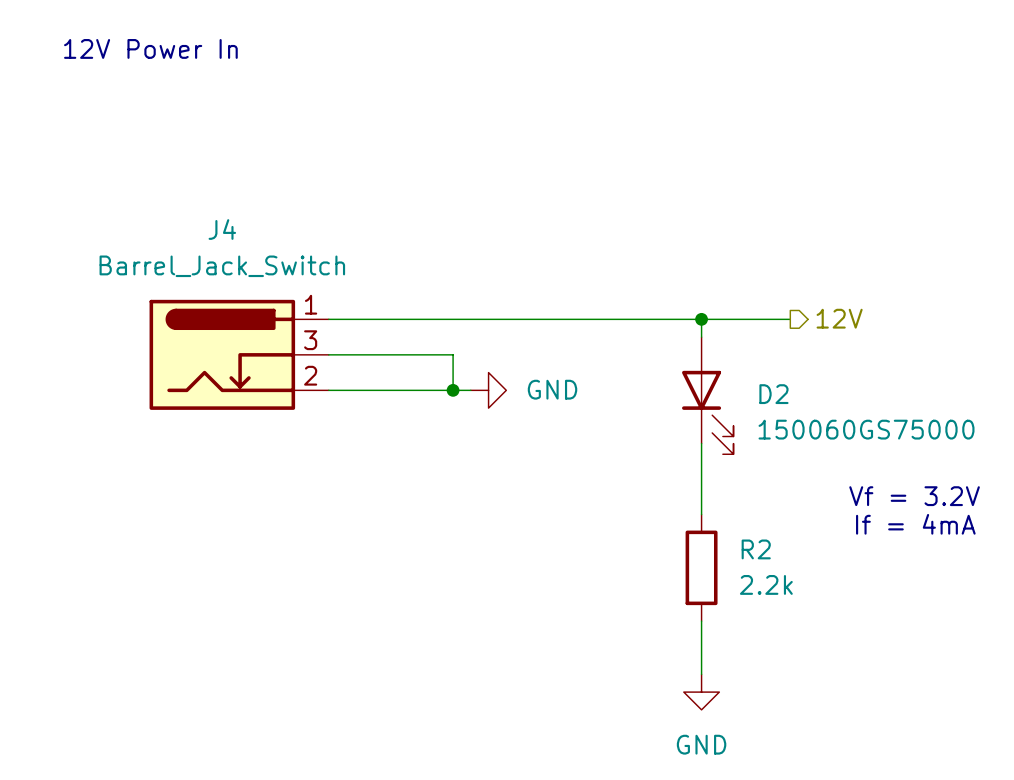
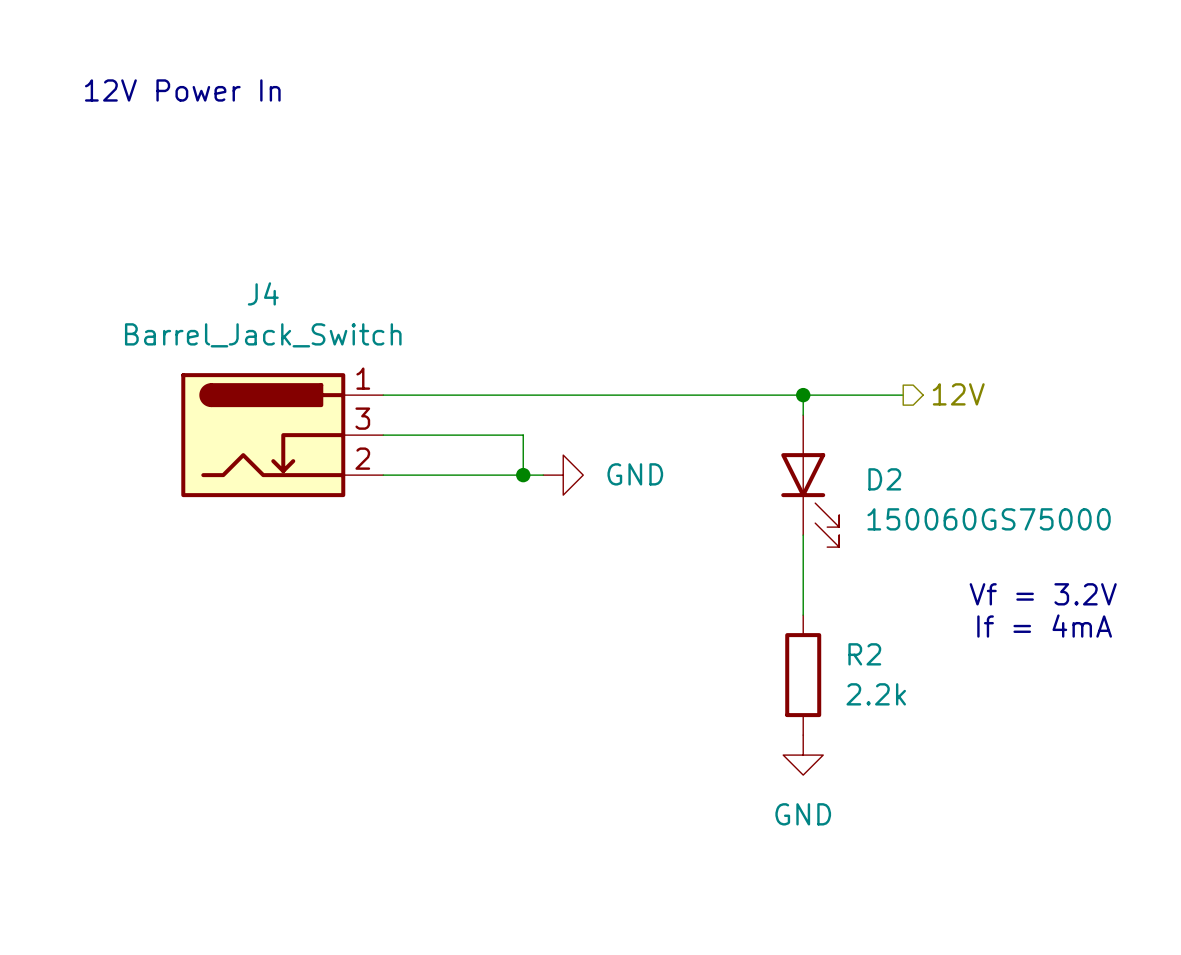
wire: (701, 621) (701, 674) -> none
power symbol position: GND (701, 692) -> GND (803, 755)

